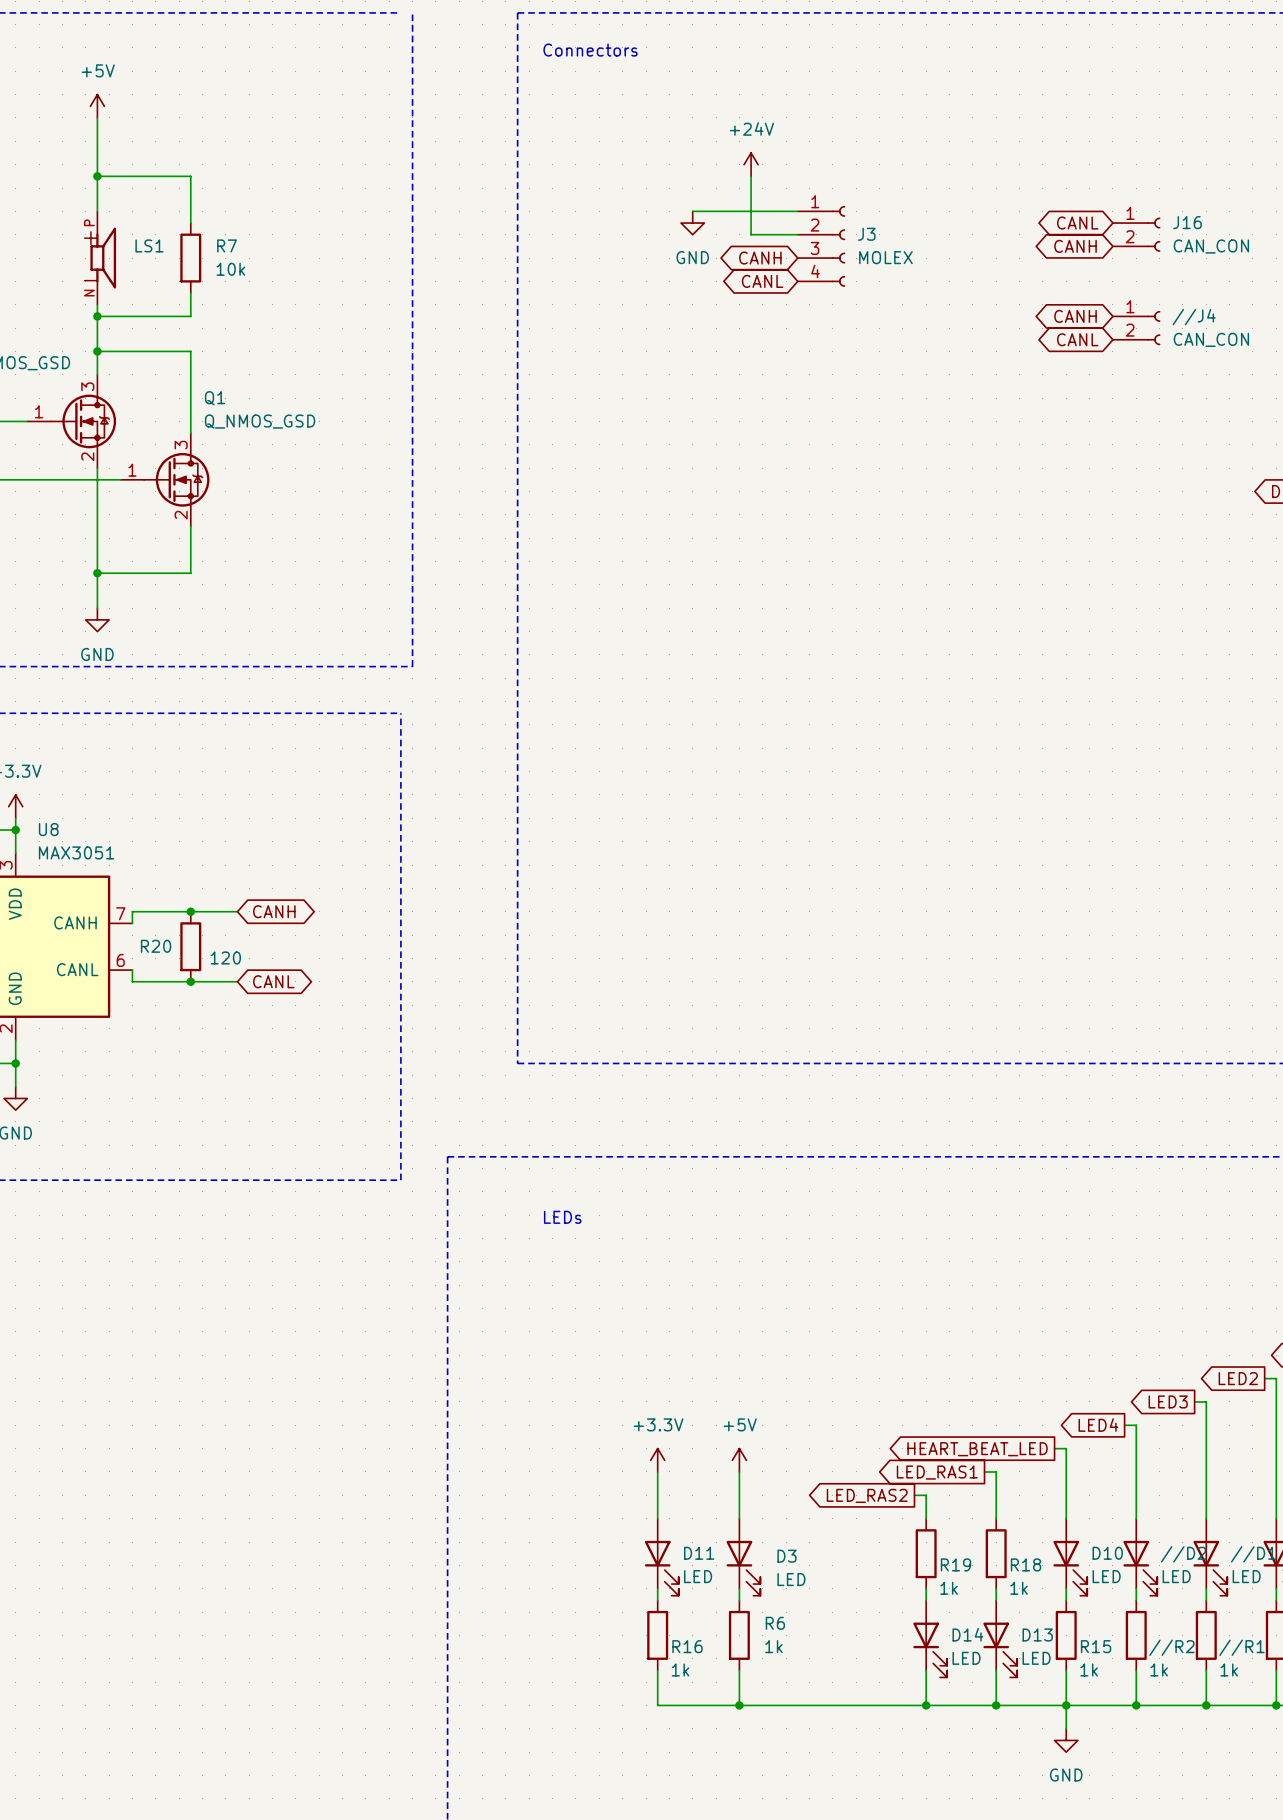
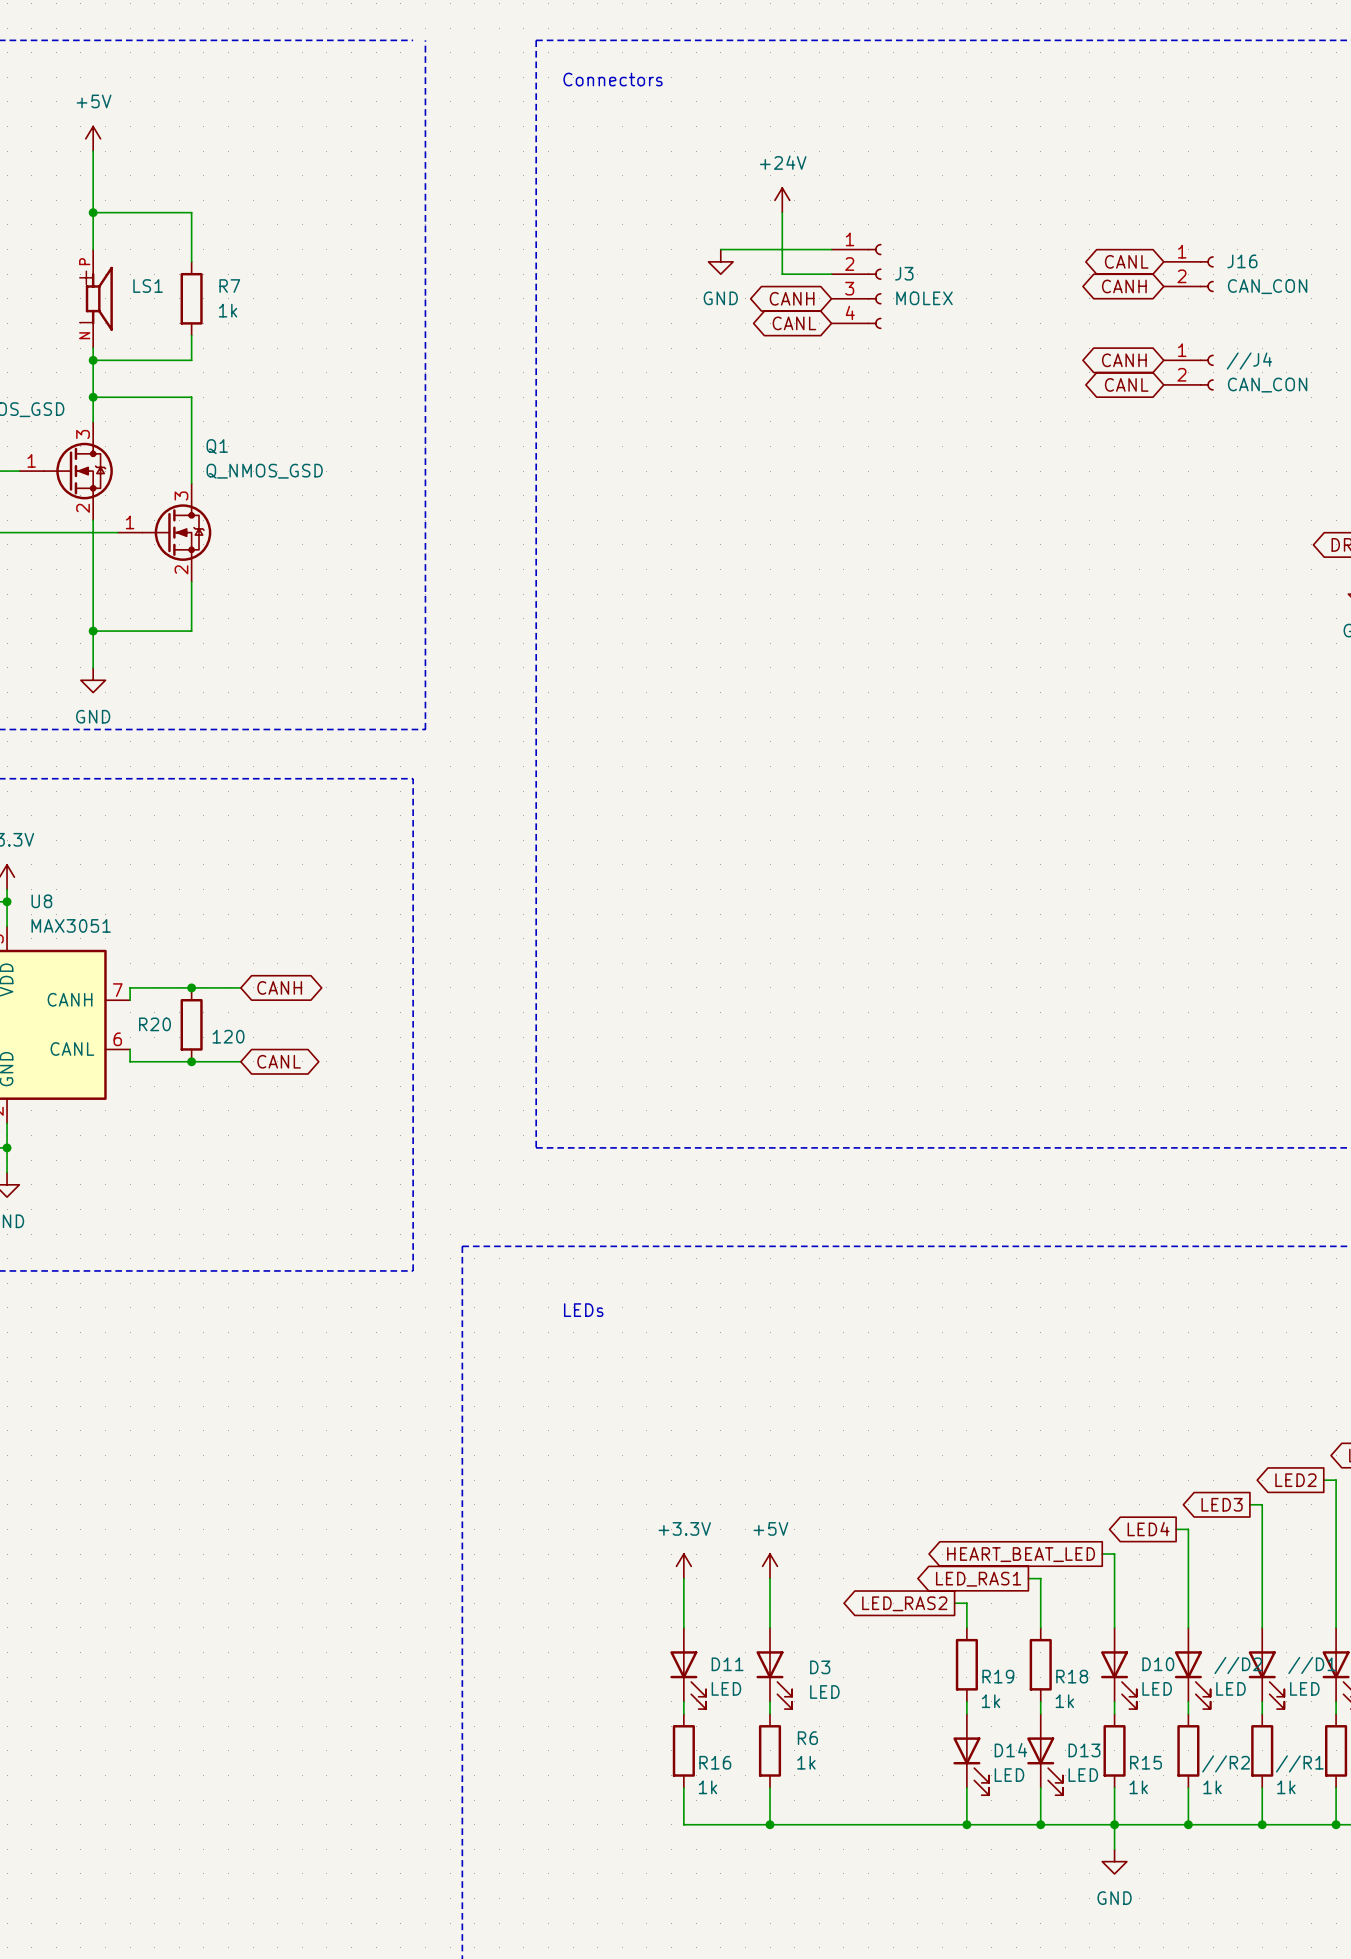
R7 value: 10k (230, 269) -> 1k (228, 310)

